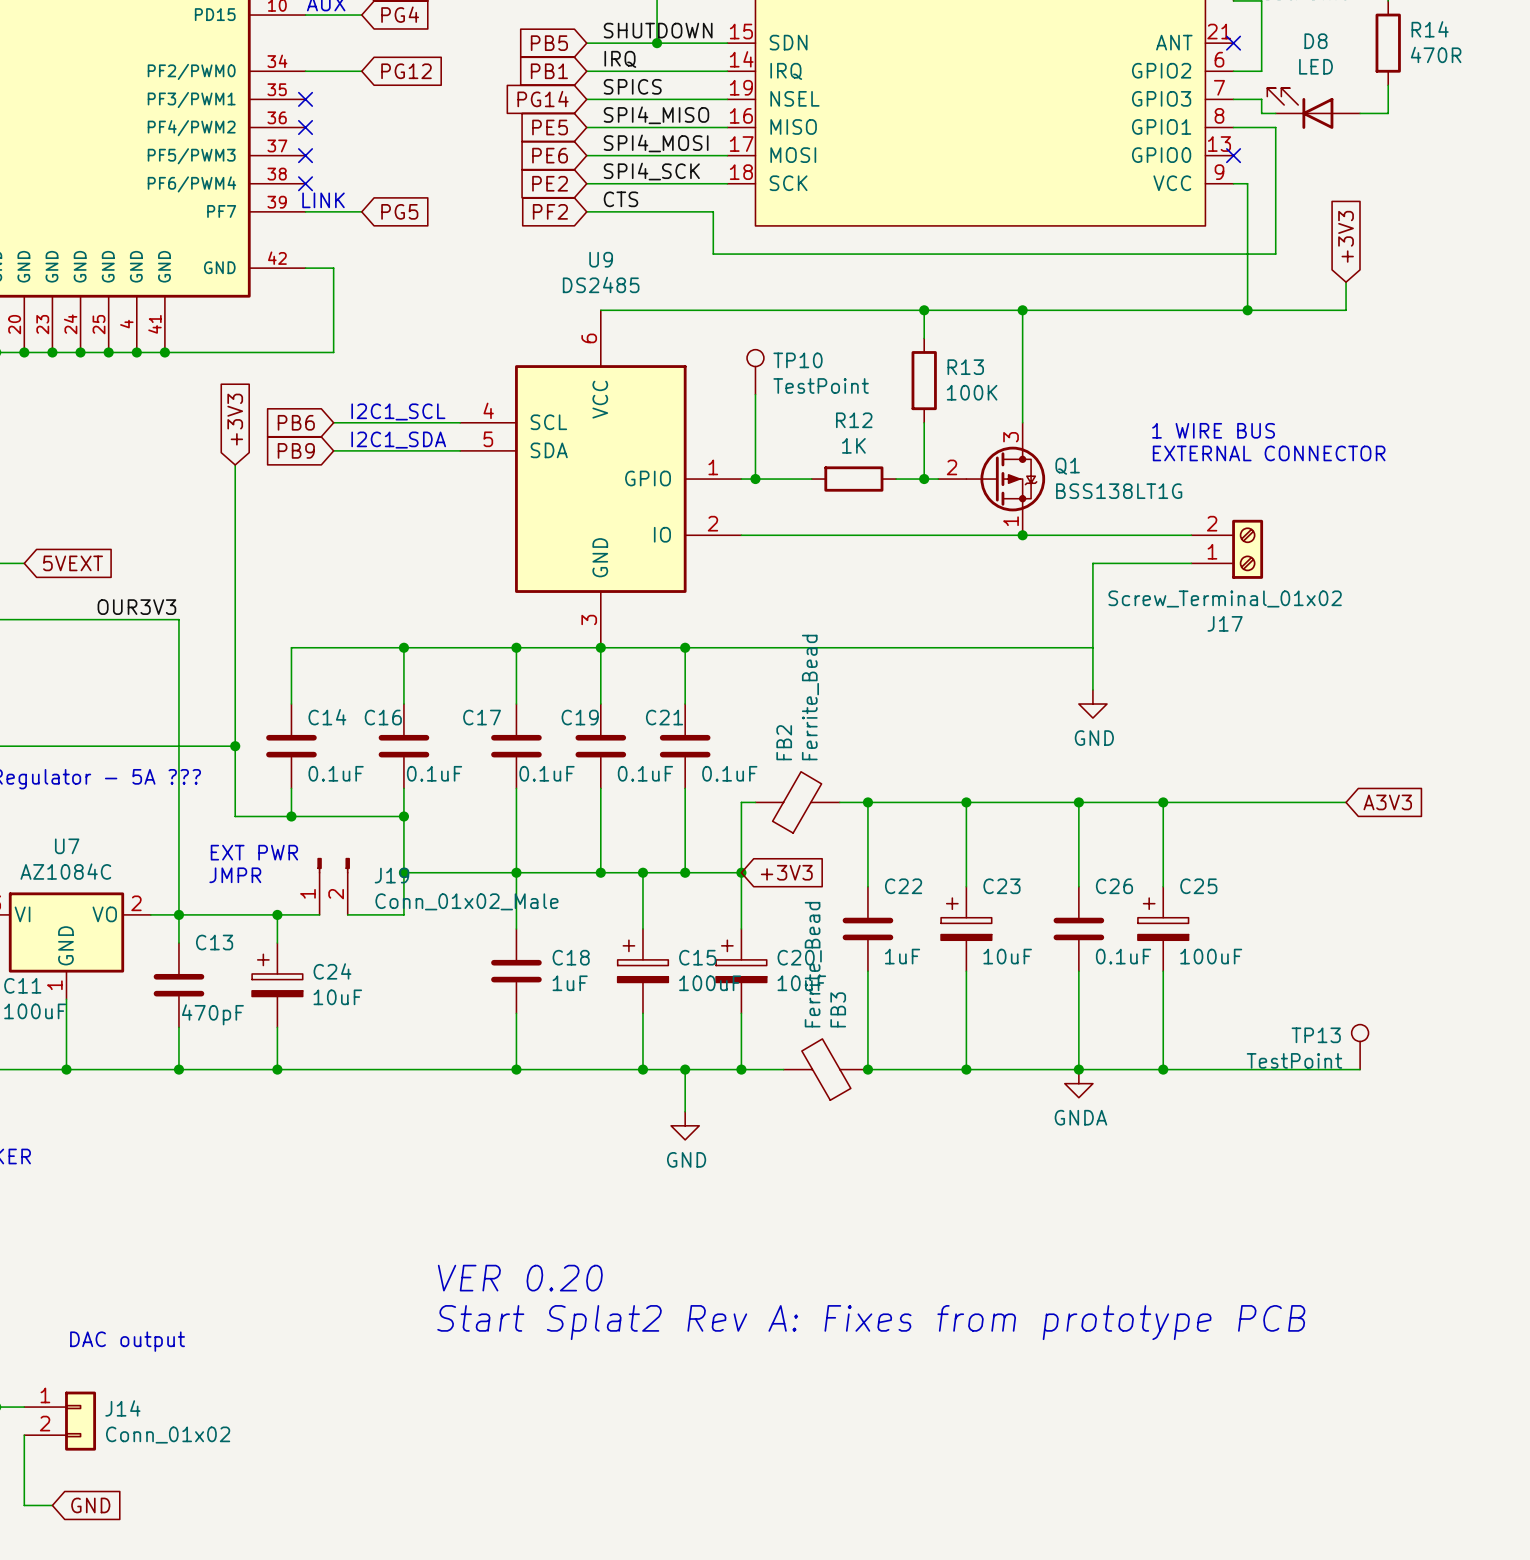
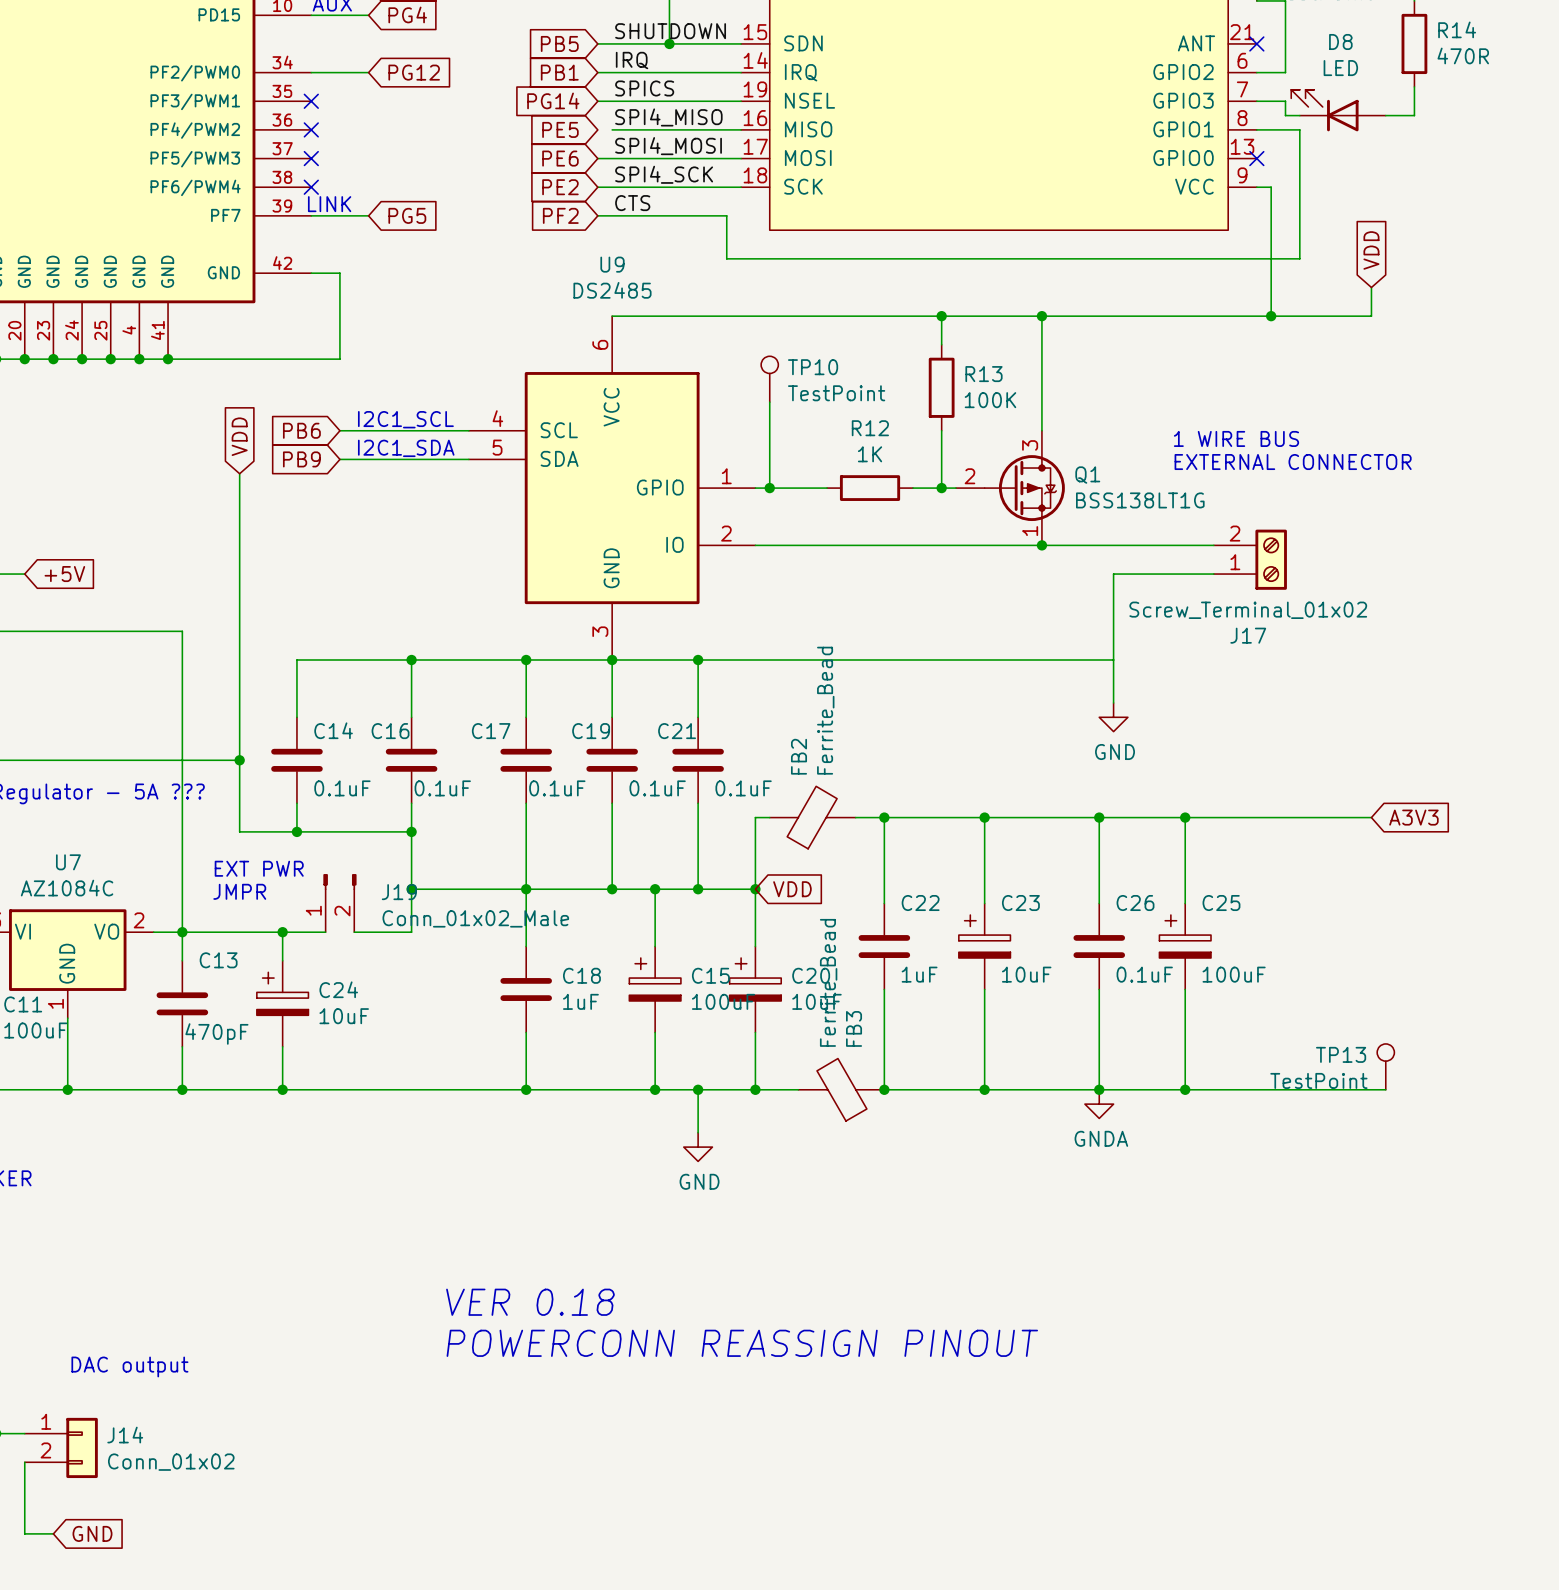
wire: (586, 127) (600, 127) -> none
global label: +3V3 (1346, 236) -> VDD (1371, 250)
global label: +3V3 (235, 419) -> VDD (239, 436)
global label: 5VEXT (73, 563) -> +5V (64, 574)
label: OUR3V3 (136, 607) -> none
global label: +3V3 (786, 872) -> VDD (792, 889)
text: VER 0.20 (520, 1278) -> VER 0.18 (530, 1302)
text: Start Splat2 Rev A: Fixes from prototype PCB (871, 1322) -> POWERCONN REASSIGN PINOUT (742, 1343)

